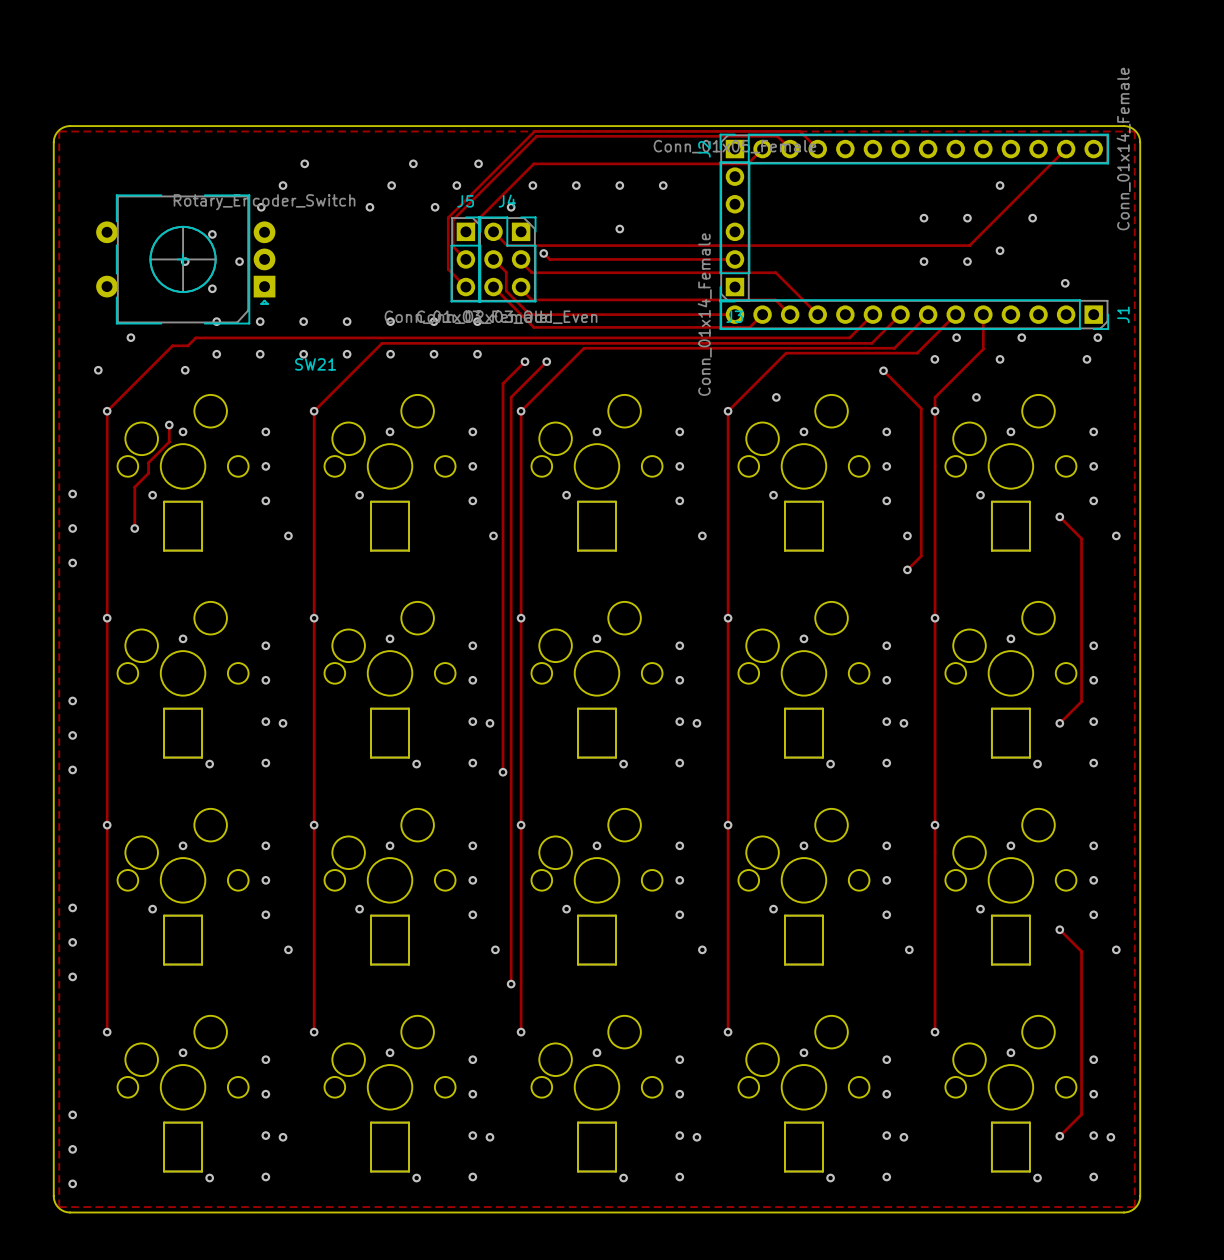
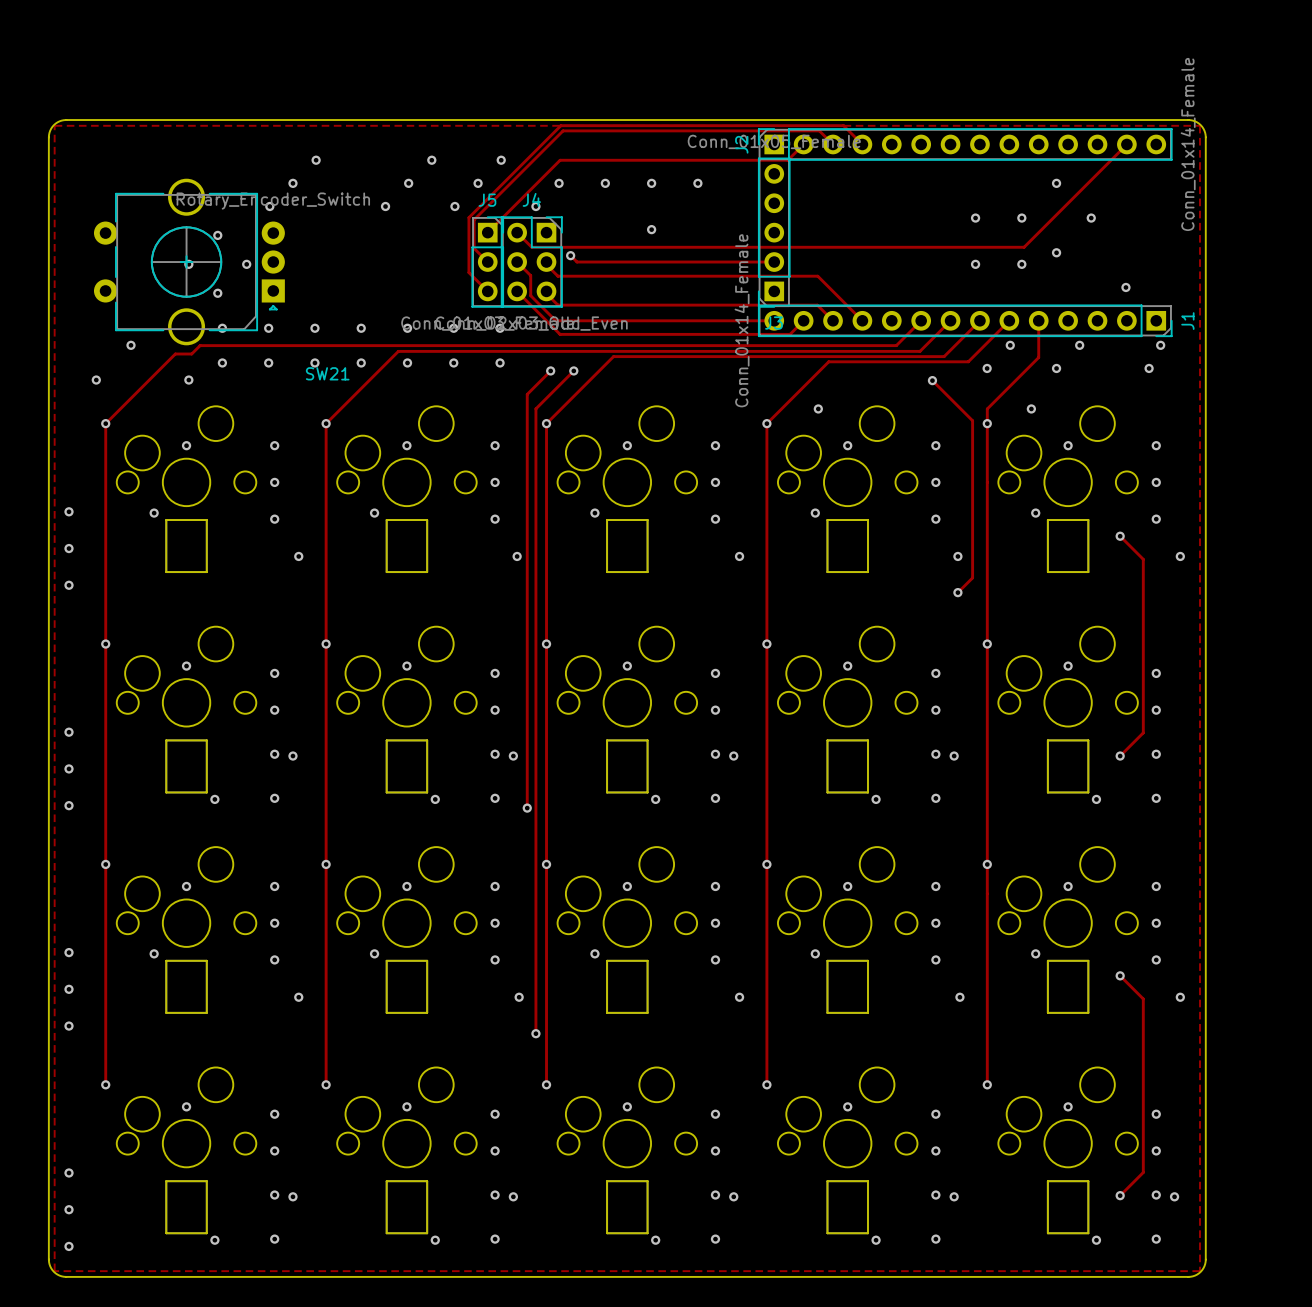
SW21 footprint: [96, 194, 276, 325] -> [93, 178, 285, 346]
track: (169, 425) (169, 442) (148, 462) (148, 473) (134, 487) (134, 528) -> none
via: (169, 425) -> none
via: (134, 528) -> none

